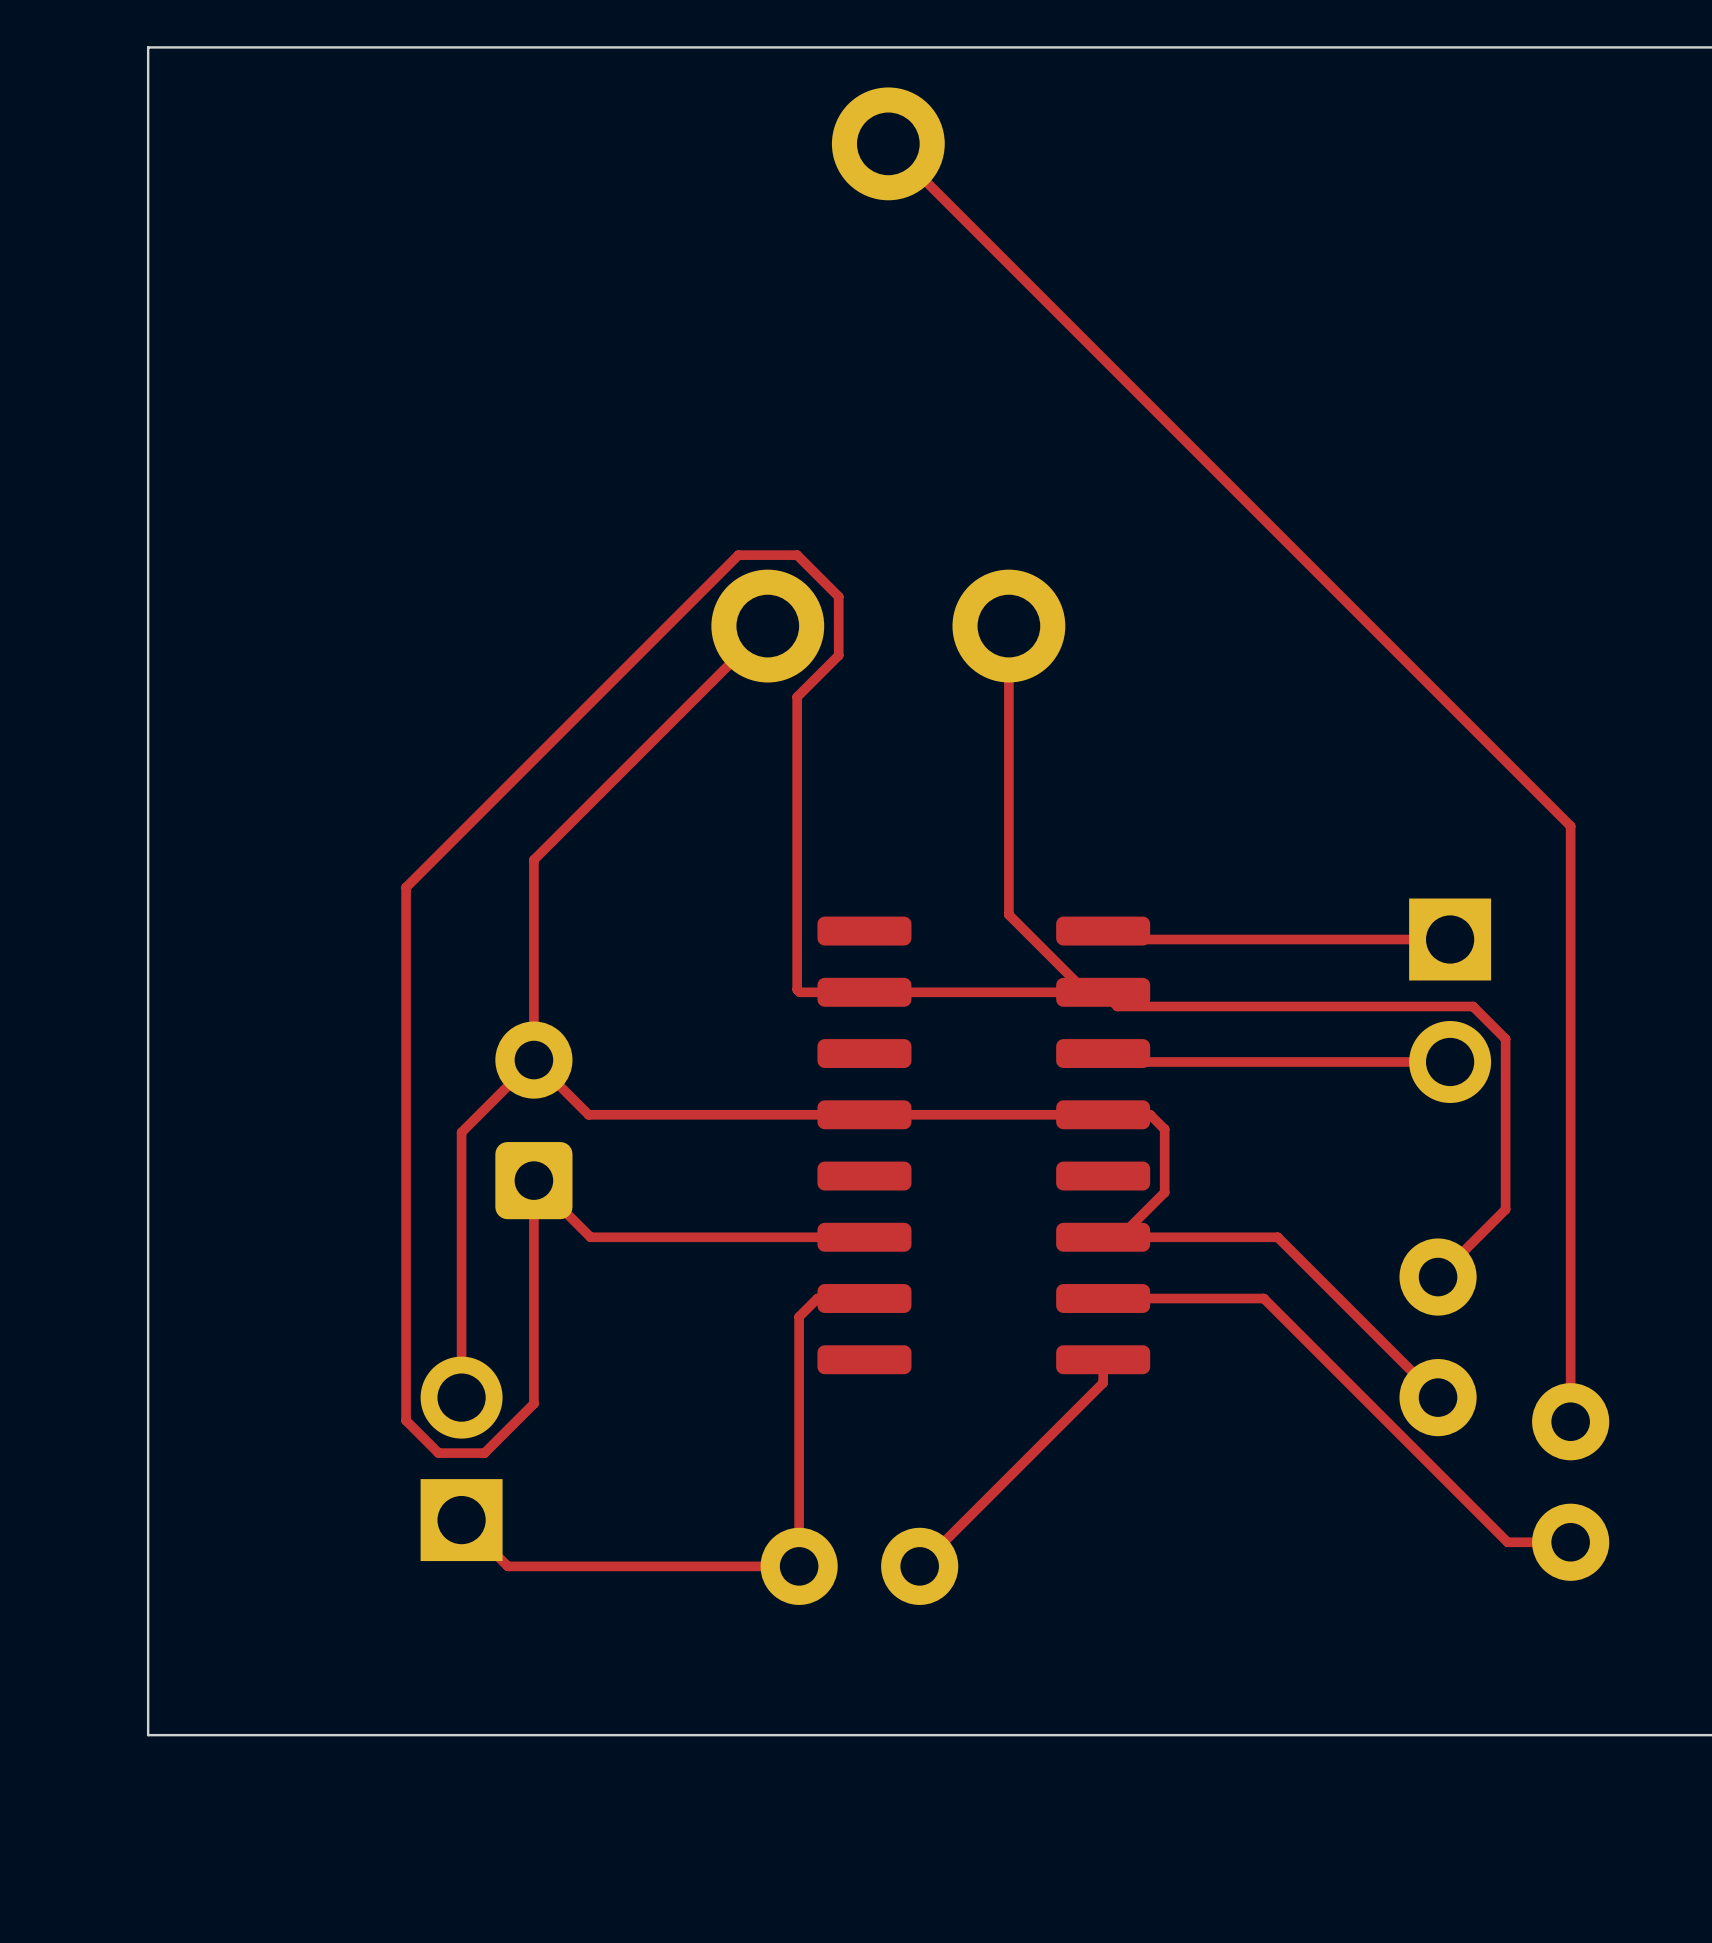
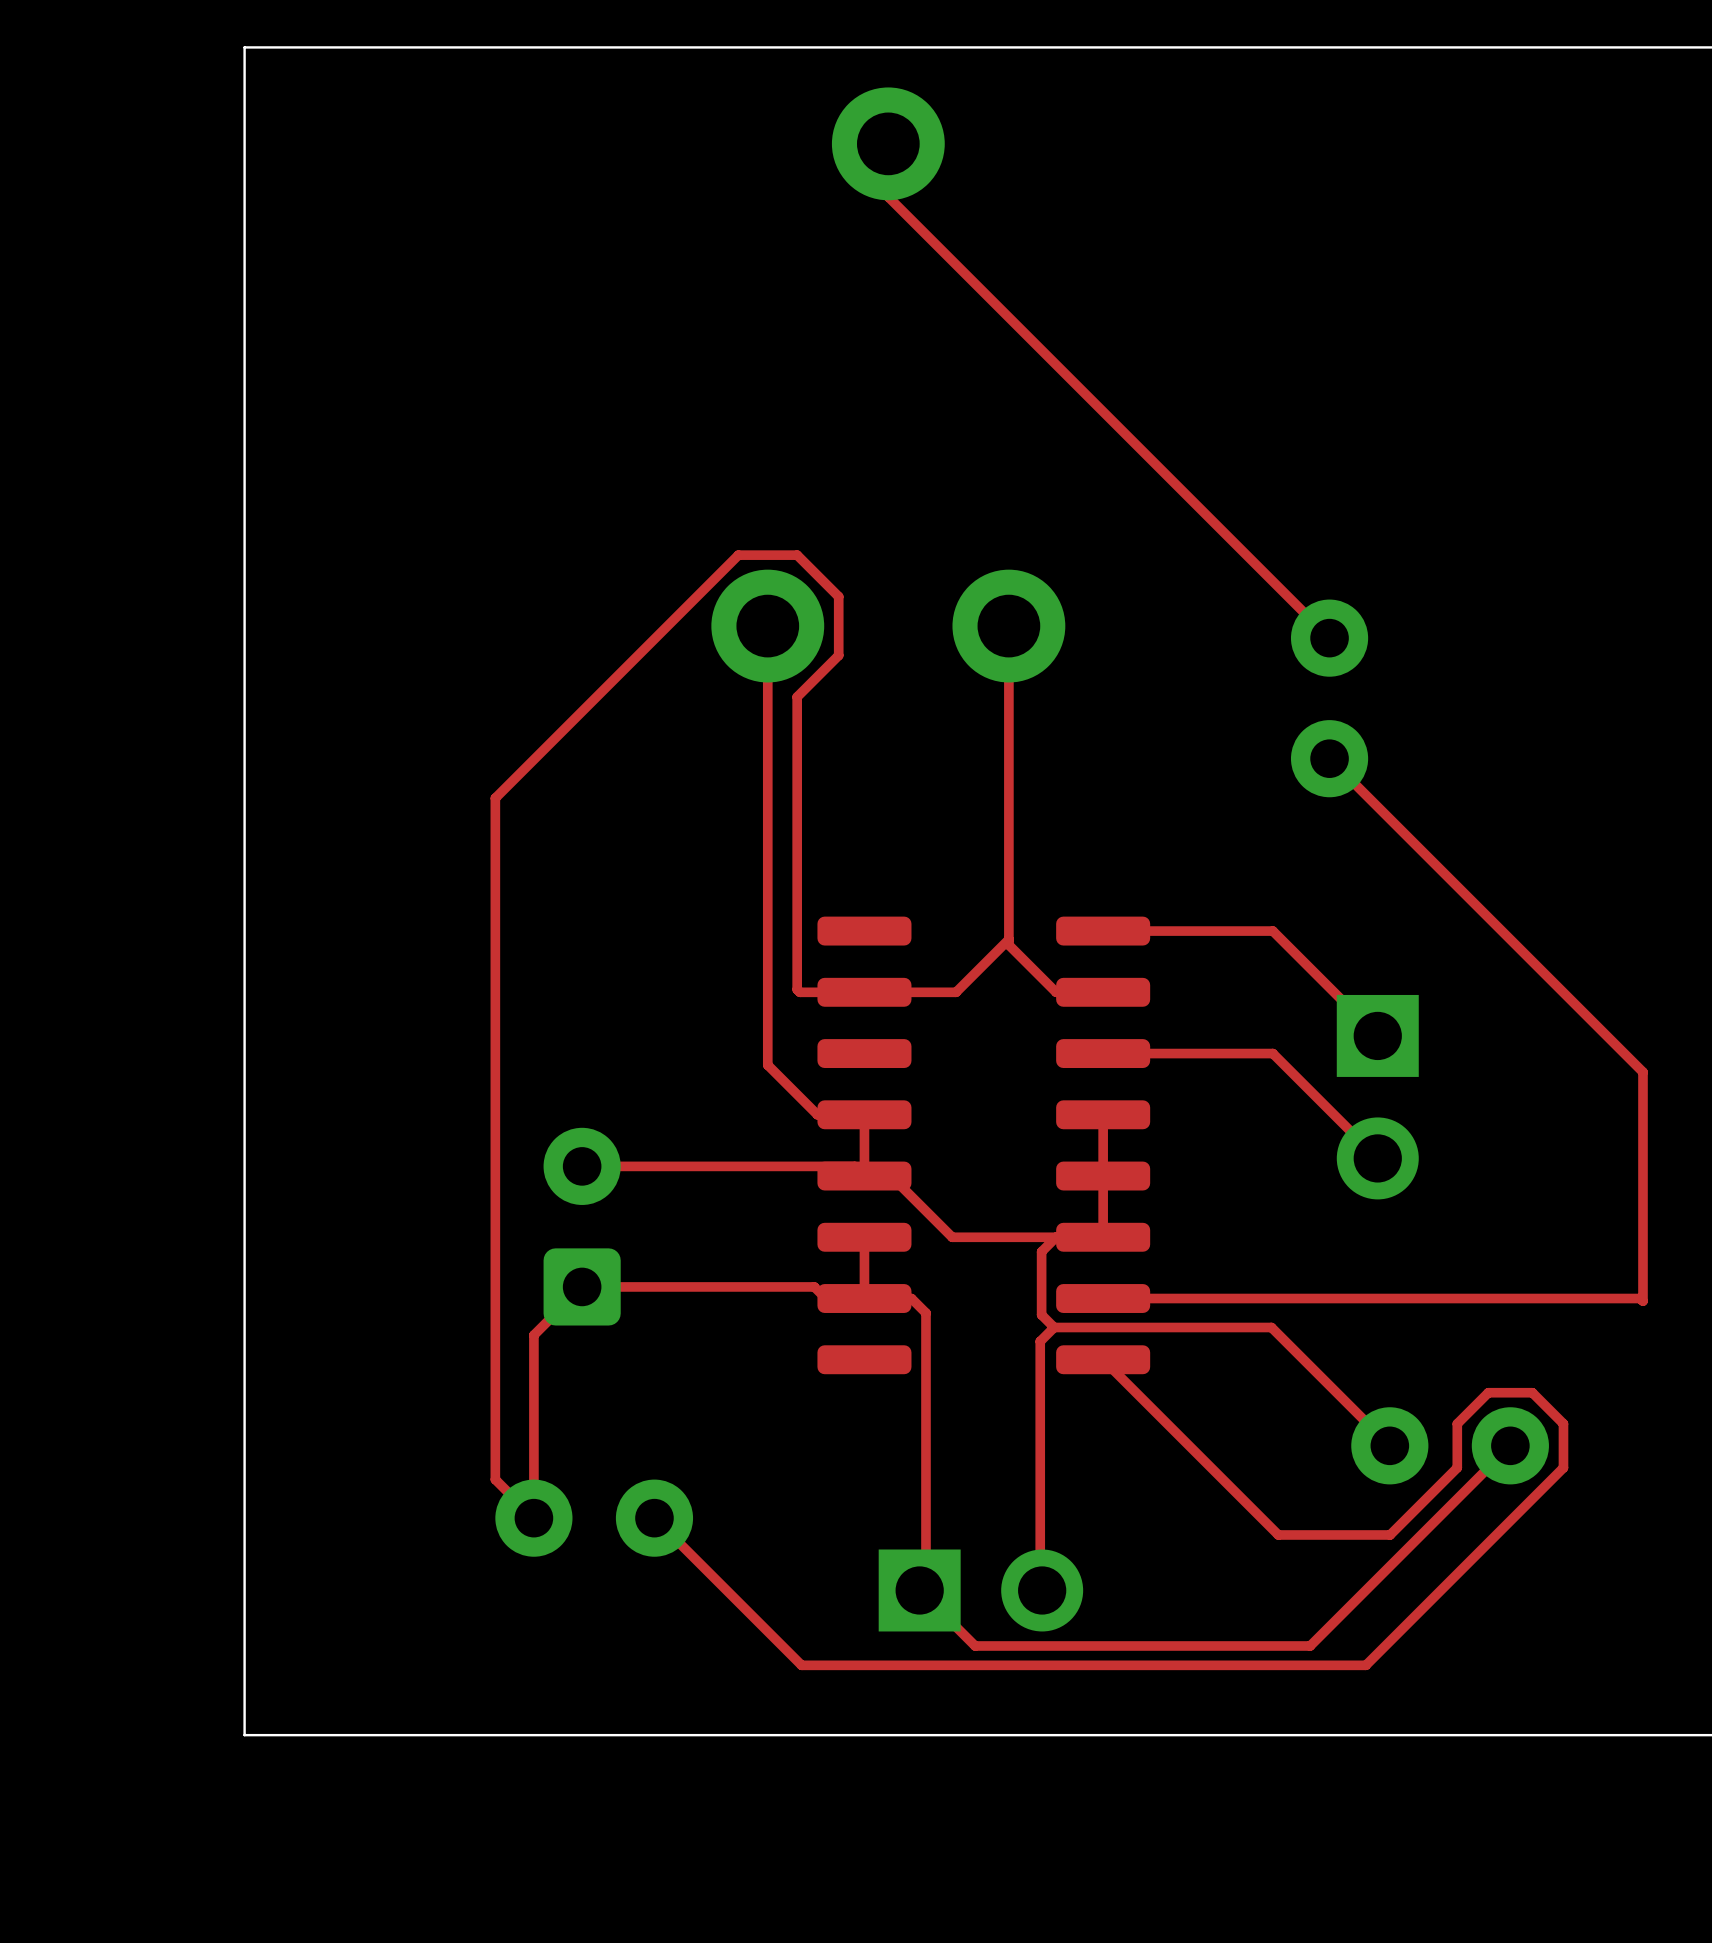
board edge: (244, 47) (148, 47) (148, 1735) (244, 1735) -> (244, 47) (244, 1735)
top track: (888, 143) (1570, 826) (1570, 1421) -> (888, 143) (888, 196) (1329, 638)
top track: (767, 626) (533, 859) (533, 1060) -> (767, 626) (767, 1065) (817, 1114)
part: none -> (1329, 698)
top track: (495, 798) (406, 887) (406, 1420) (438, 1453) (484, 1453) (533, 1403) -> (495, 798) (495, 1479) (533, 1518) (533, 1403)
top track: (1008, 914) (1086, 992) -> (1008, 914) (1008, 945) (1056, 992)
top track: (1103, 931) (1111, 939) (1450, 939) -> (1103, 931) (1272, 931) (1377, 1035)
top track: (1056, 992) (956, 992) -> (1008, 939) (956, 992)
top track: (1103, 992) (1117, 1006) (1473, 1006) (1505, 1039) (1505, 1209) (1438, 1277) -> none
part position: (1450, 1000) -> (1377, 1097)
top track: (1103, 1053) (1111, 1061) (1450, 1061) -> (1103, 1053) (1272, 1053) (1377, 1158)
top track: (533, 1060) (461, 1132) (461, 1397) -> none
top track: (533, 1060) (588, 1114) (817, 1114) -> none
top track: (864, 1114) (1150, 1114) (1164, 1129) (1164, 1192) (1119, 1237) -> (864, 1114) (864, 1176)
top track: none -> (1103, 1114) (1103, 1237) (952, 1237) (890, 1176) (864, 1176)
part position: (533, 1120) -> (582, 1226)
top track: none -> (582, 1166) (854, 1166) (864, 1176)
top track: (864, 1237) (590, 1237) (533, 1180) (533, 1335) -> (825, 1298) (814, 1286) (582, 1286) (533, 1335)
top track: none -> (864, 1237) (864, 1298) (911, 1298) (925, 1313) (925, 1584) (919, 1590) (975, 1645) (1310, 1645) (1510, 1445)
top track: none -> (1056, 1237) (1041, 1251) (1041, 1314) (1054, 1327)
top track: (1103, 1237) (1277, 1237) (1438, 1397) -> none
top track: (825, 1298) (817, 1298) (799, 1316) (799, 1566) (507, 1566) (461, 1520) -> none
top track: (1263, 1298) (1507, 1542) (1570, 1542) -> (1263, 1298) (1640, 1298) (1642, 1301) (1642, 1072) (1329, 758)
top track: none -> (1054, 1327) (1271, 1327) (1389, 1445)
top track: none -> (1054, 1327) (1040, 1341) (1040, 1588) (1042, 1590)
part: (1438, 1337) -> none
top track: (1103, 1359) (1103, 1382) (919, 1566) -> (1103, 1359) (1278, 1534) (1390, 1534) (1457, 1467) (1457, 1423) (1488, 1392) (1532, 1392) (1563, 1423) (1563, 1467) (1365, 1665) (801, 1665) (654, 1518)
part: none -> (1450, 1445)
part: (461, 1458) -> none
part: (1570, 1481) -> none
part position: (859, 1566) -> (594, 1518)
part: none -> (980, 1590)

